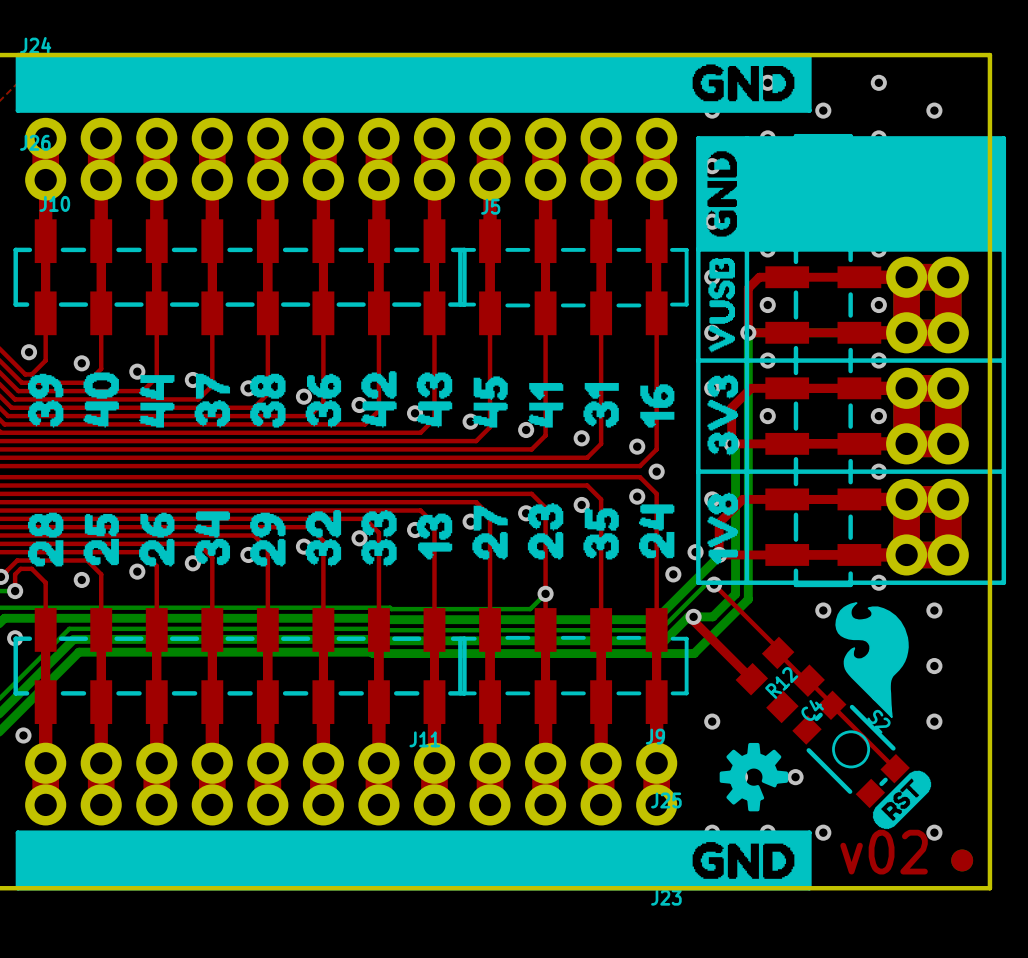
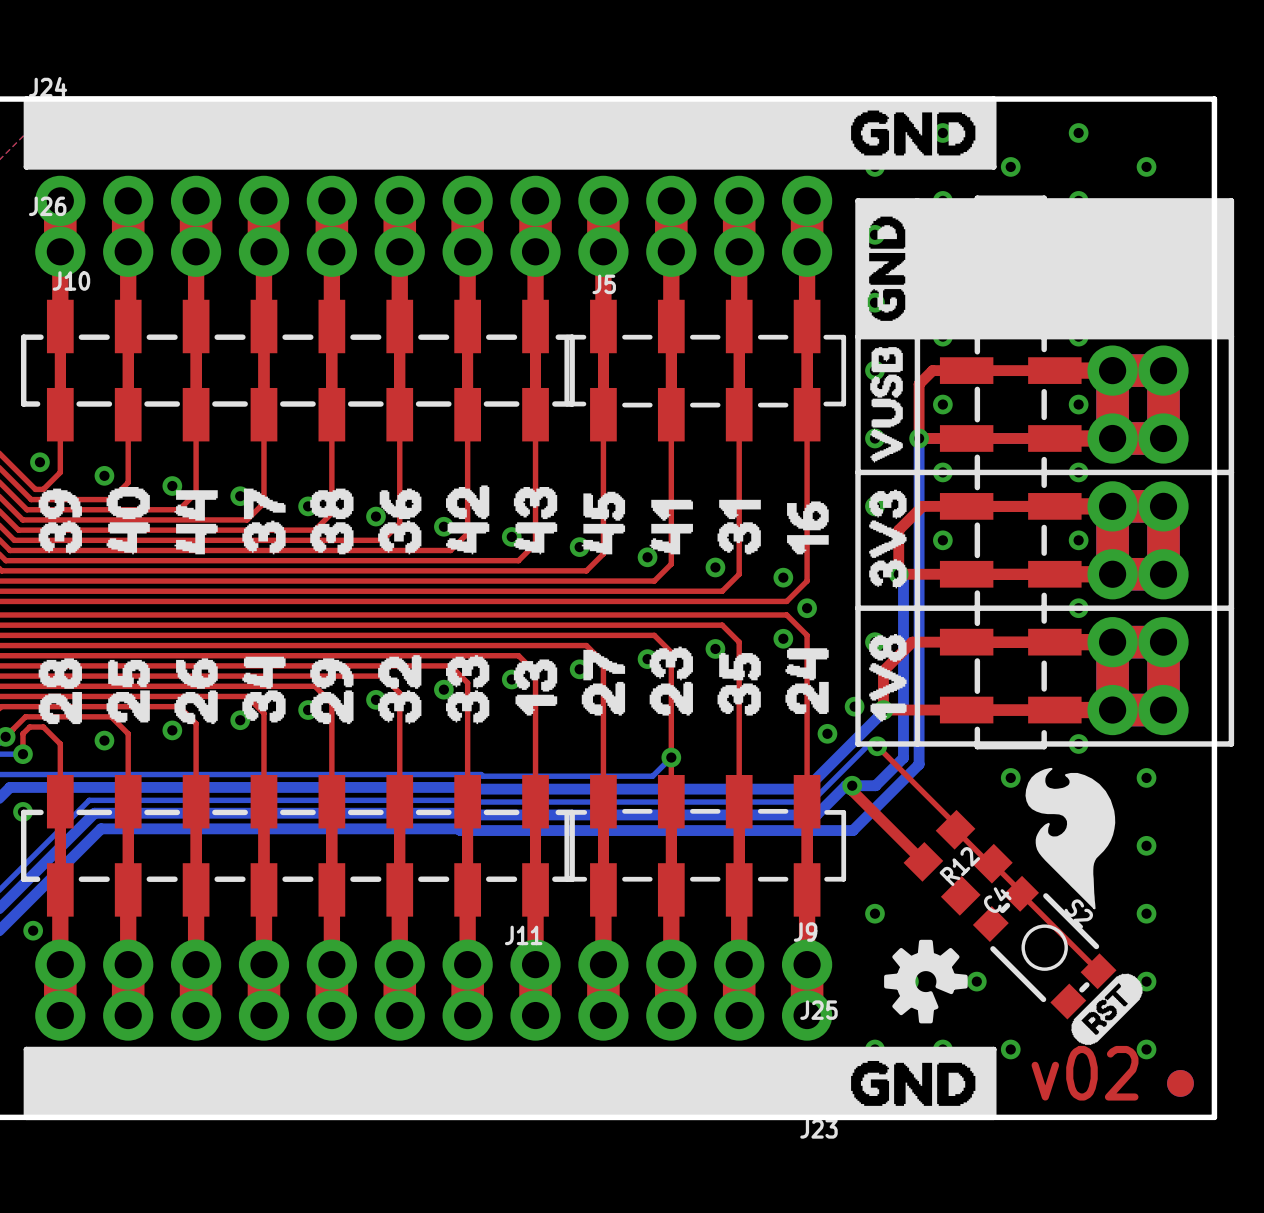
via: none -> (1146, 981)

